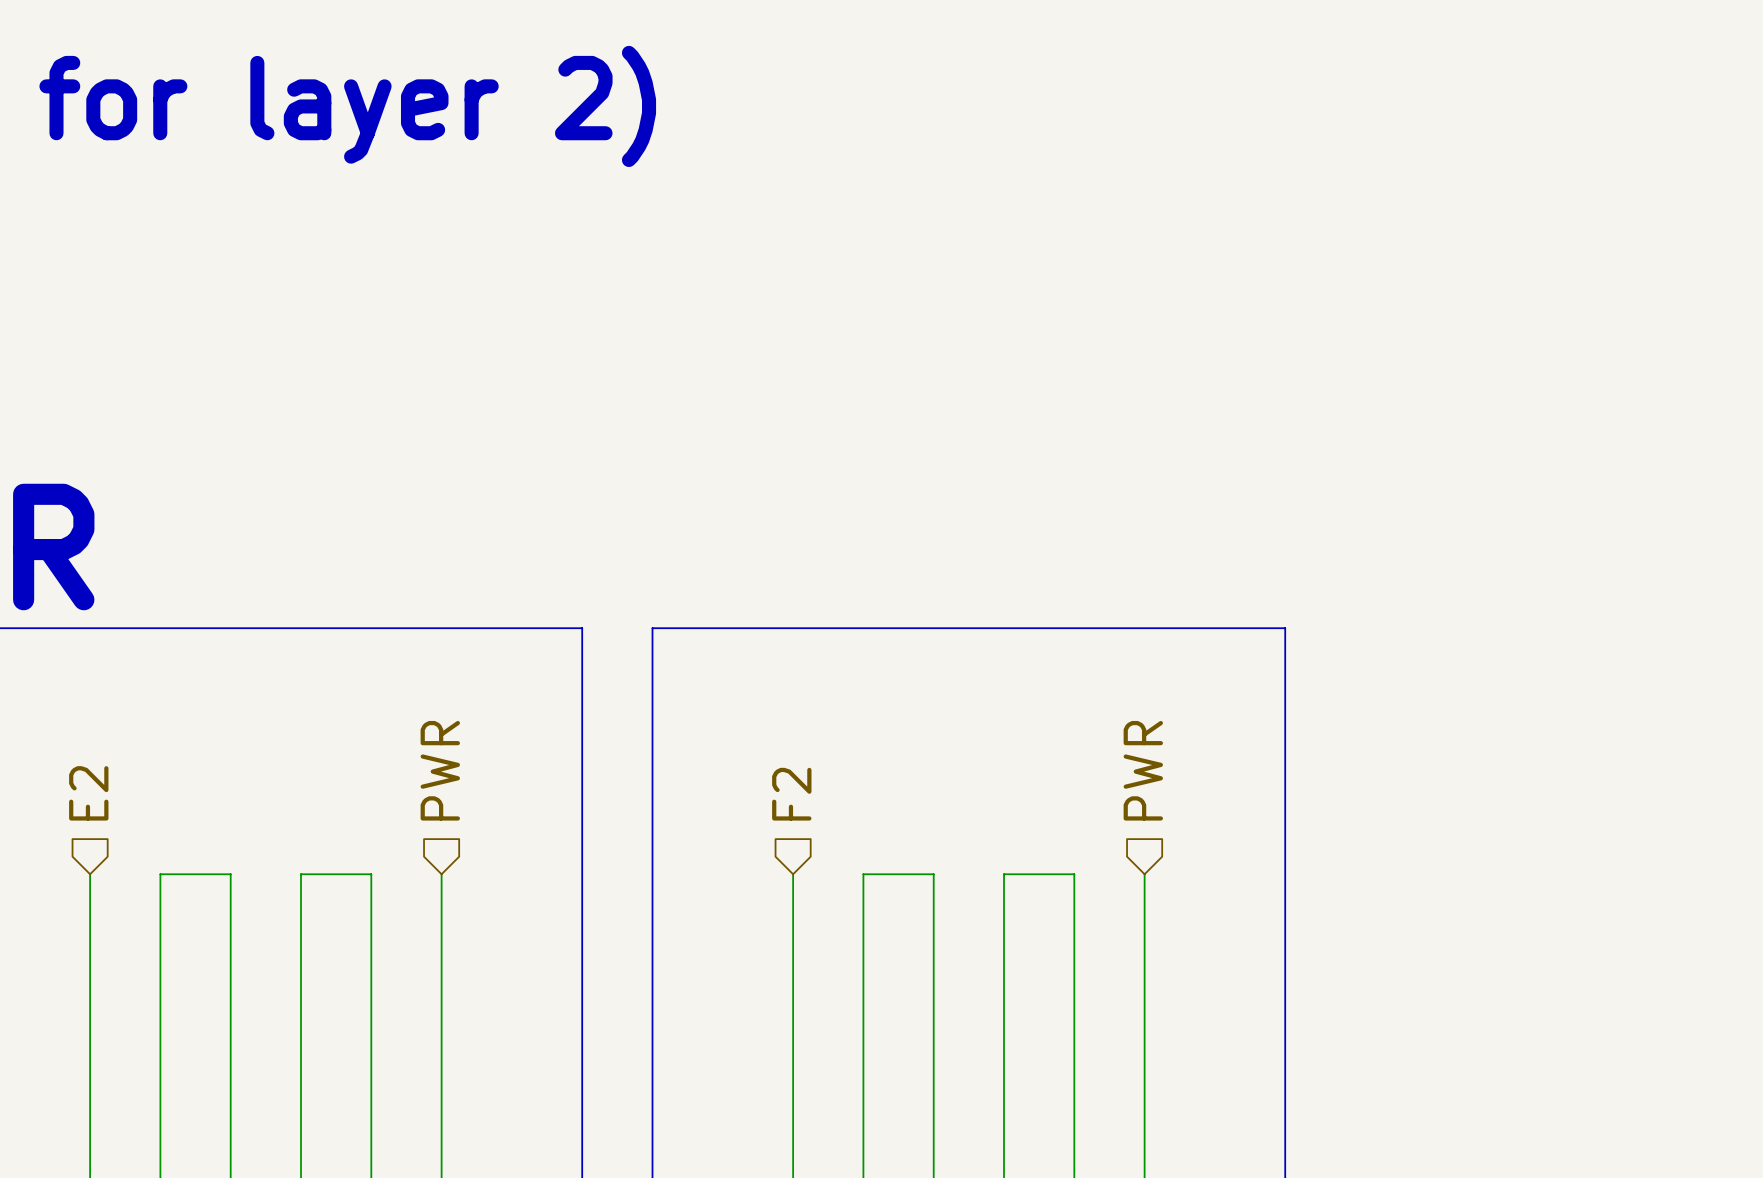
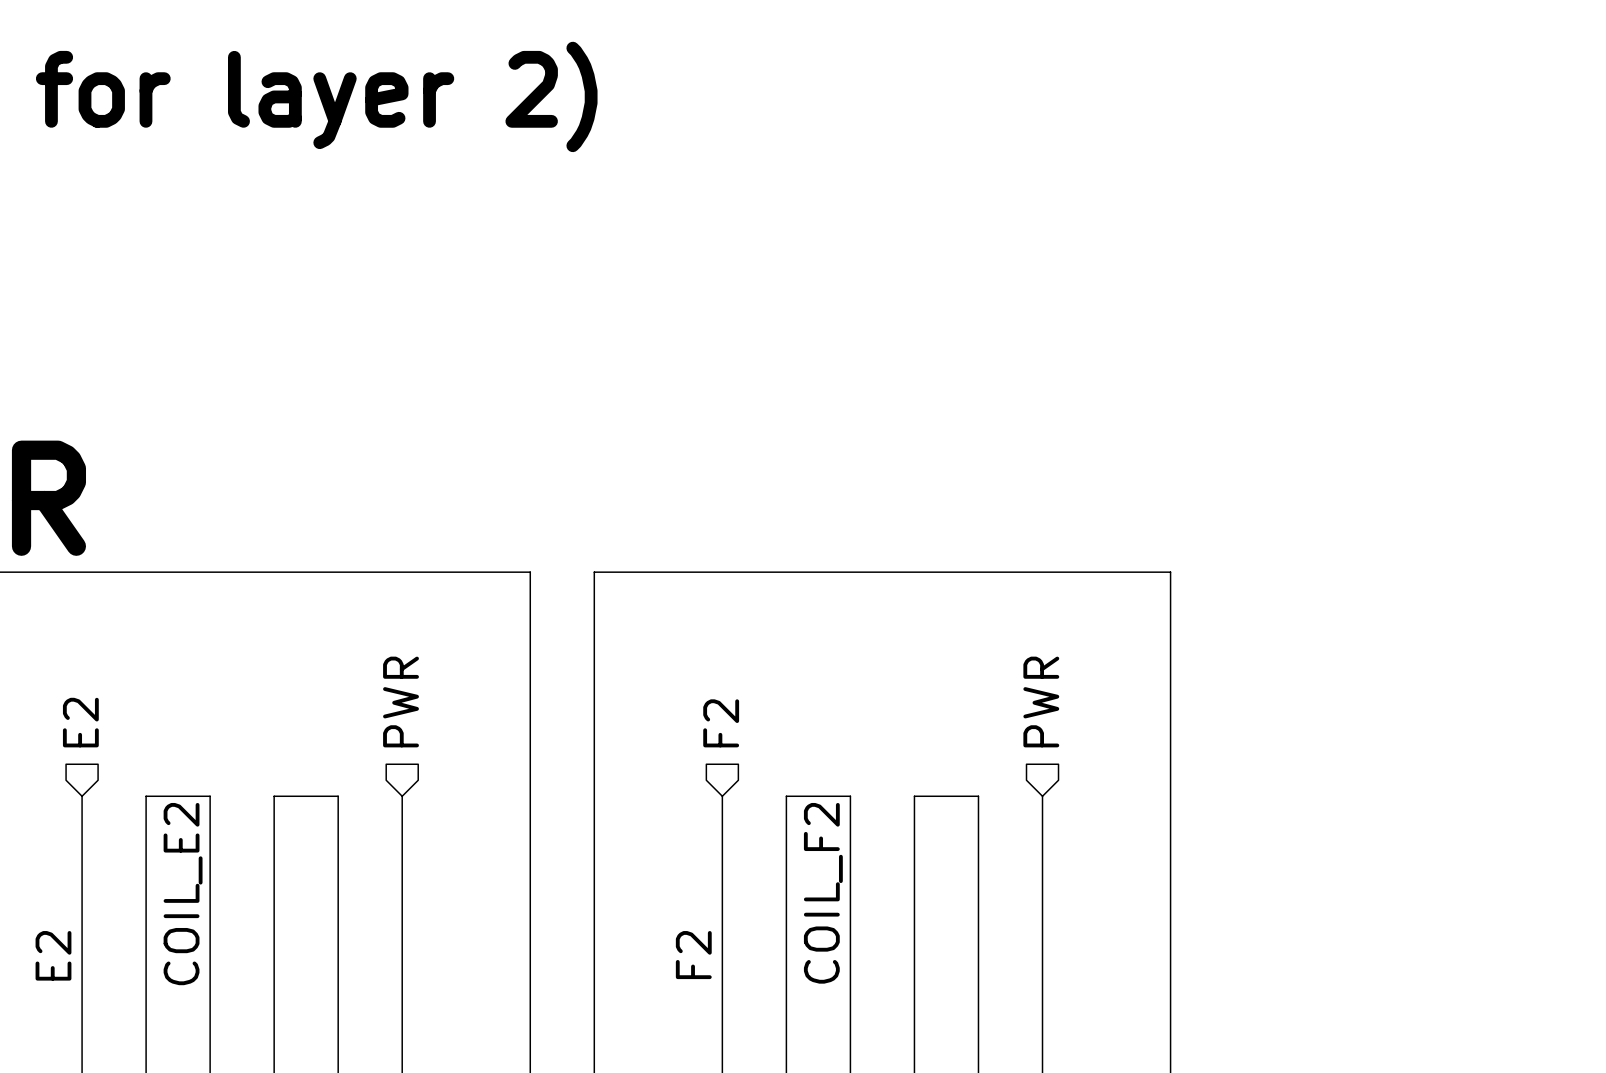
label: none -> COIL_F2 (823, 893)
label: none -> COIL_E2 (183, 894)
label: none -> F2 (693, 955)
label: none -> E2 (53, 955)

